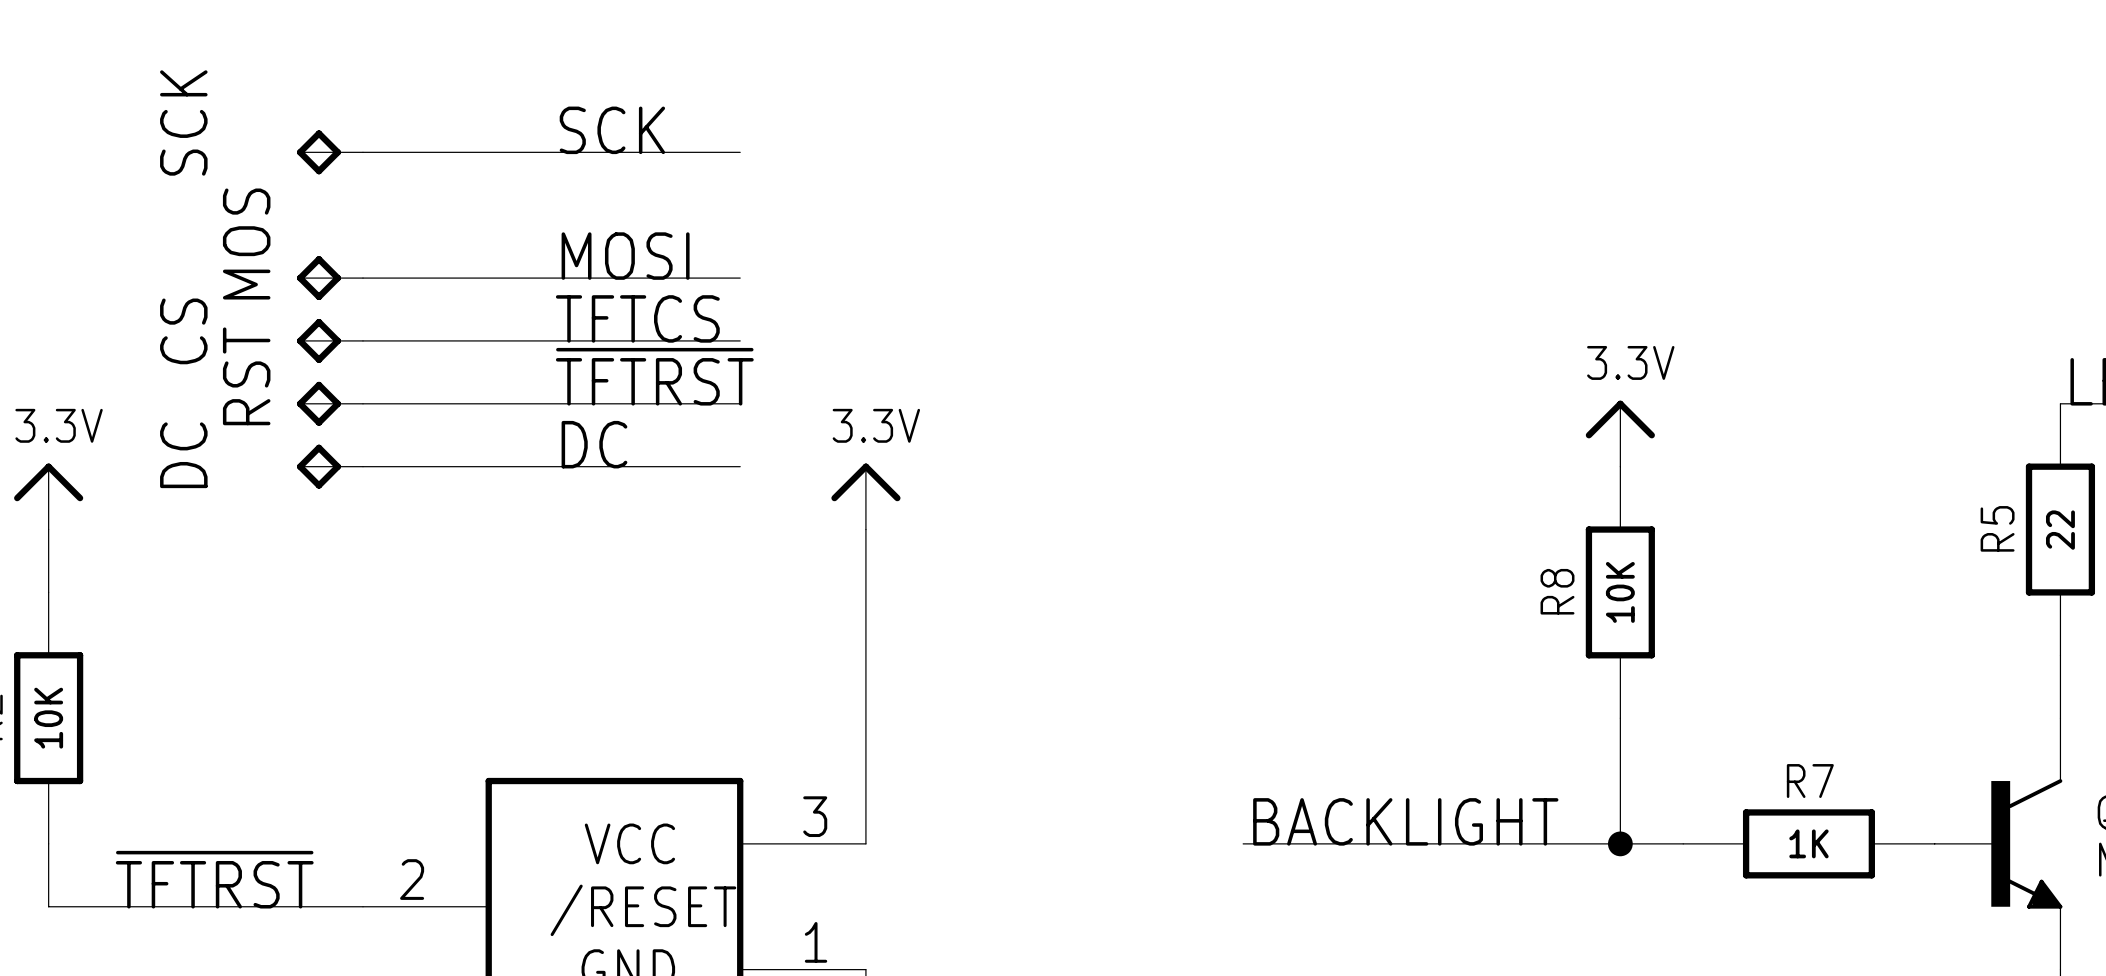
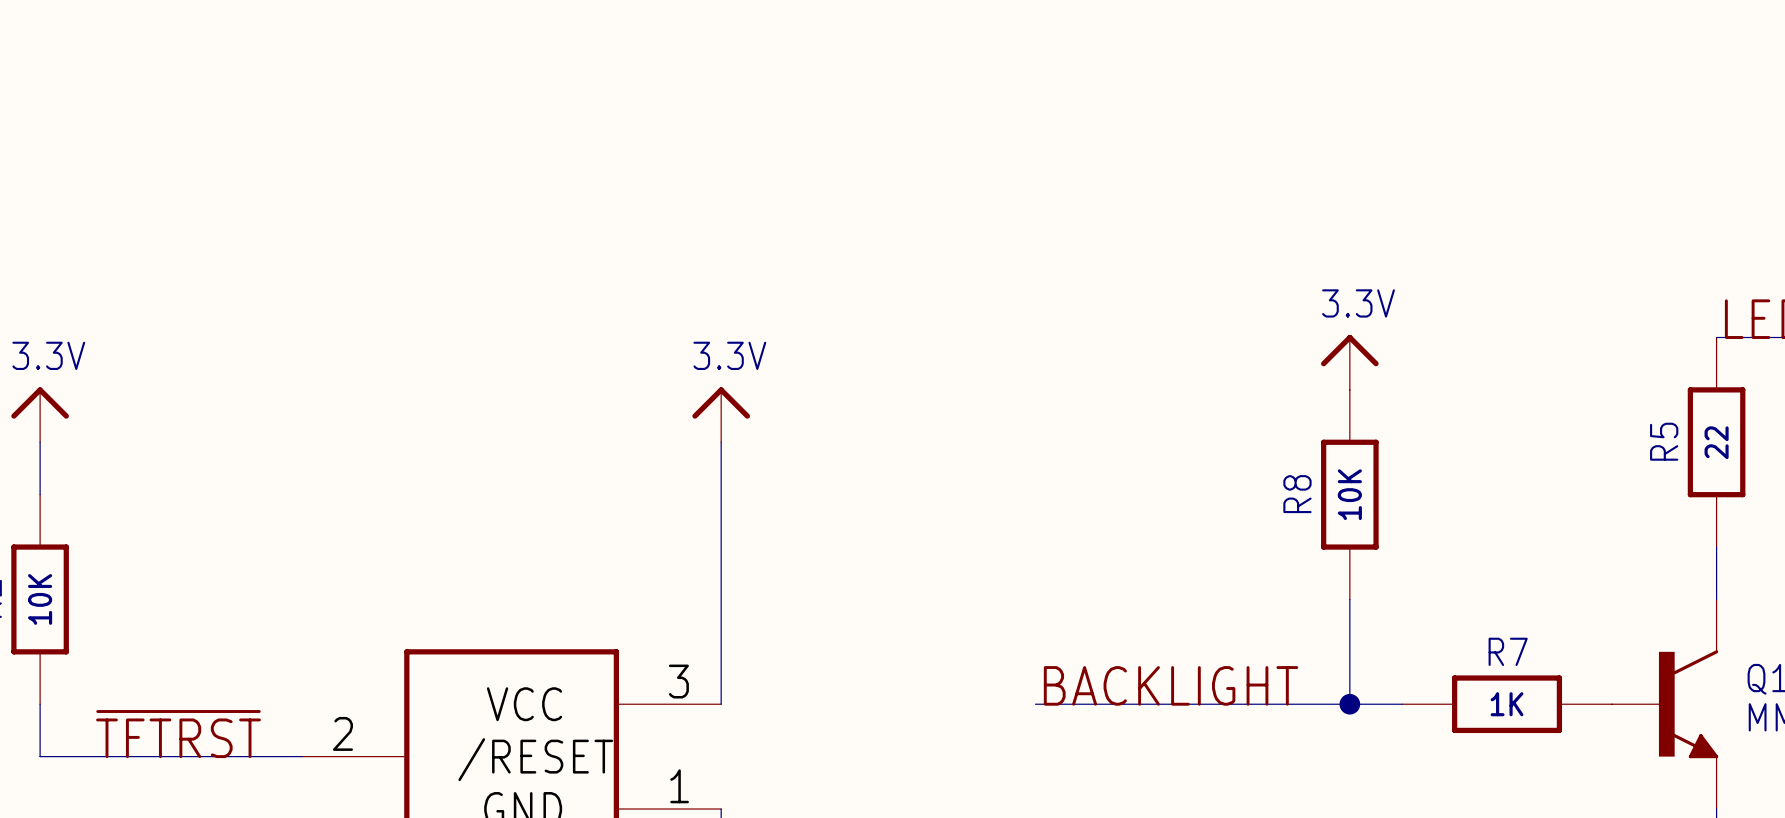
label: SCK (612, 130) -> none
SCK: (329, 152) -> none
wire: (362, 152) (740, 152) -> none
label: MOSI (625, 256) -> none
MOS: (329, 278) -> none
wire: (362, 278) (740, 278) -> none
label: TFTCS (637, 318) -> none
CS: (329, 340) -> none
wire: (362, 340) (740, 340) -> none
label: ~{TFTRST} (654, 376) -> none
RST: (329, 403) -> none
wire: (362, 403) (740, 403) -> none
label: DC (594, 444) -> none
DC: (329, 466) -> none
wire: (362, 466) (740, 466) -> none

